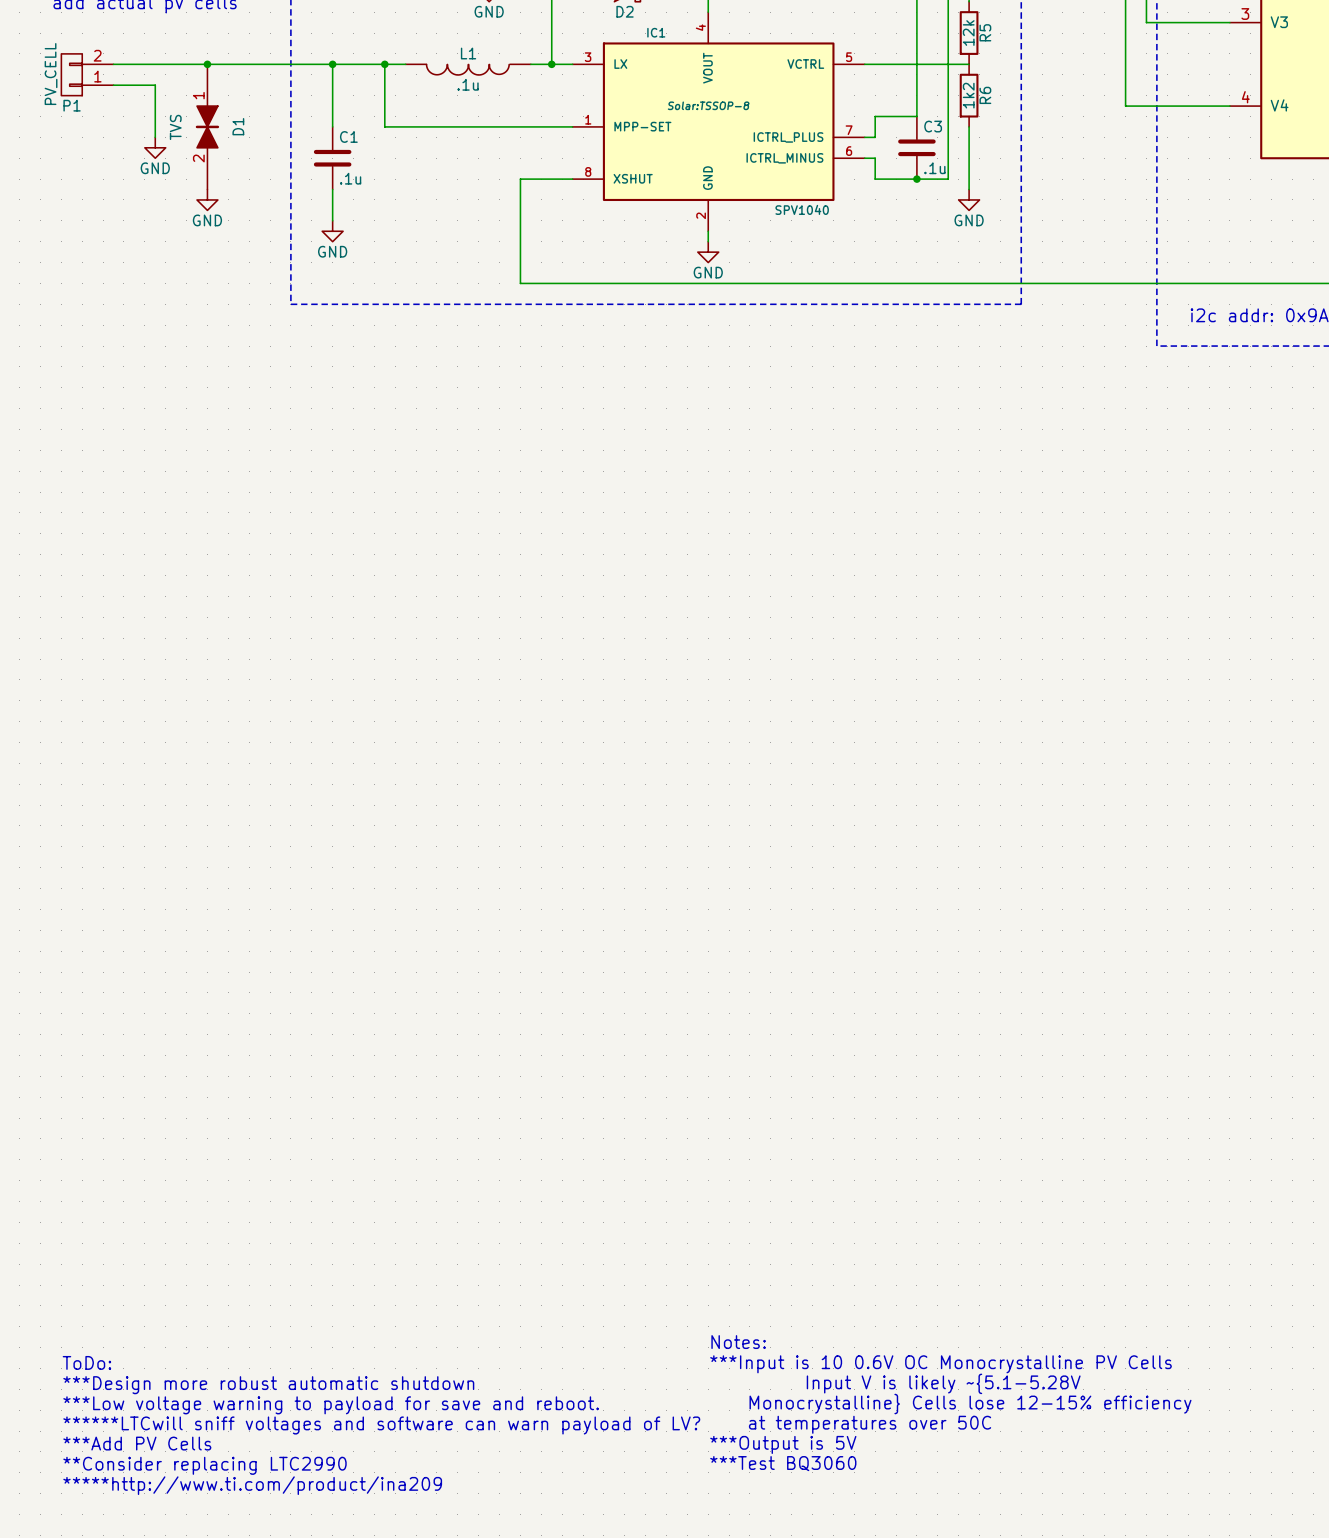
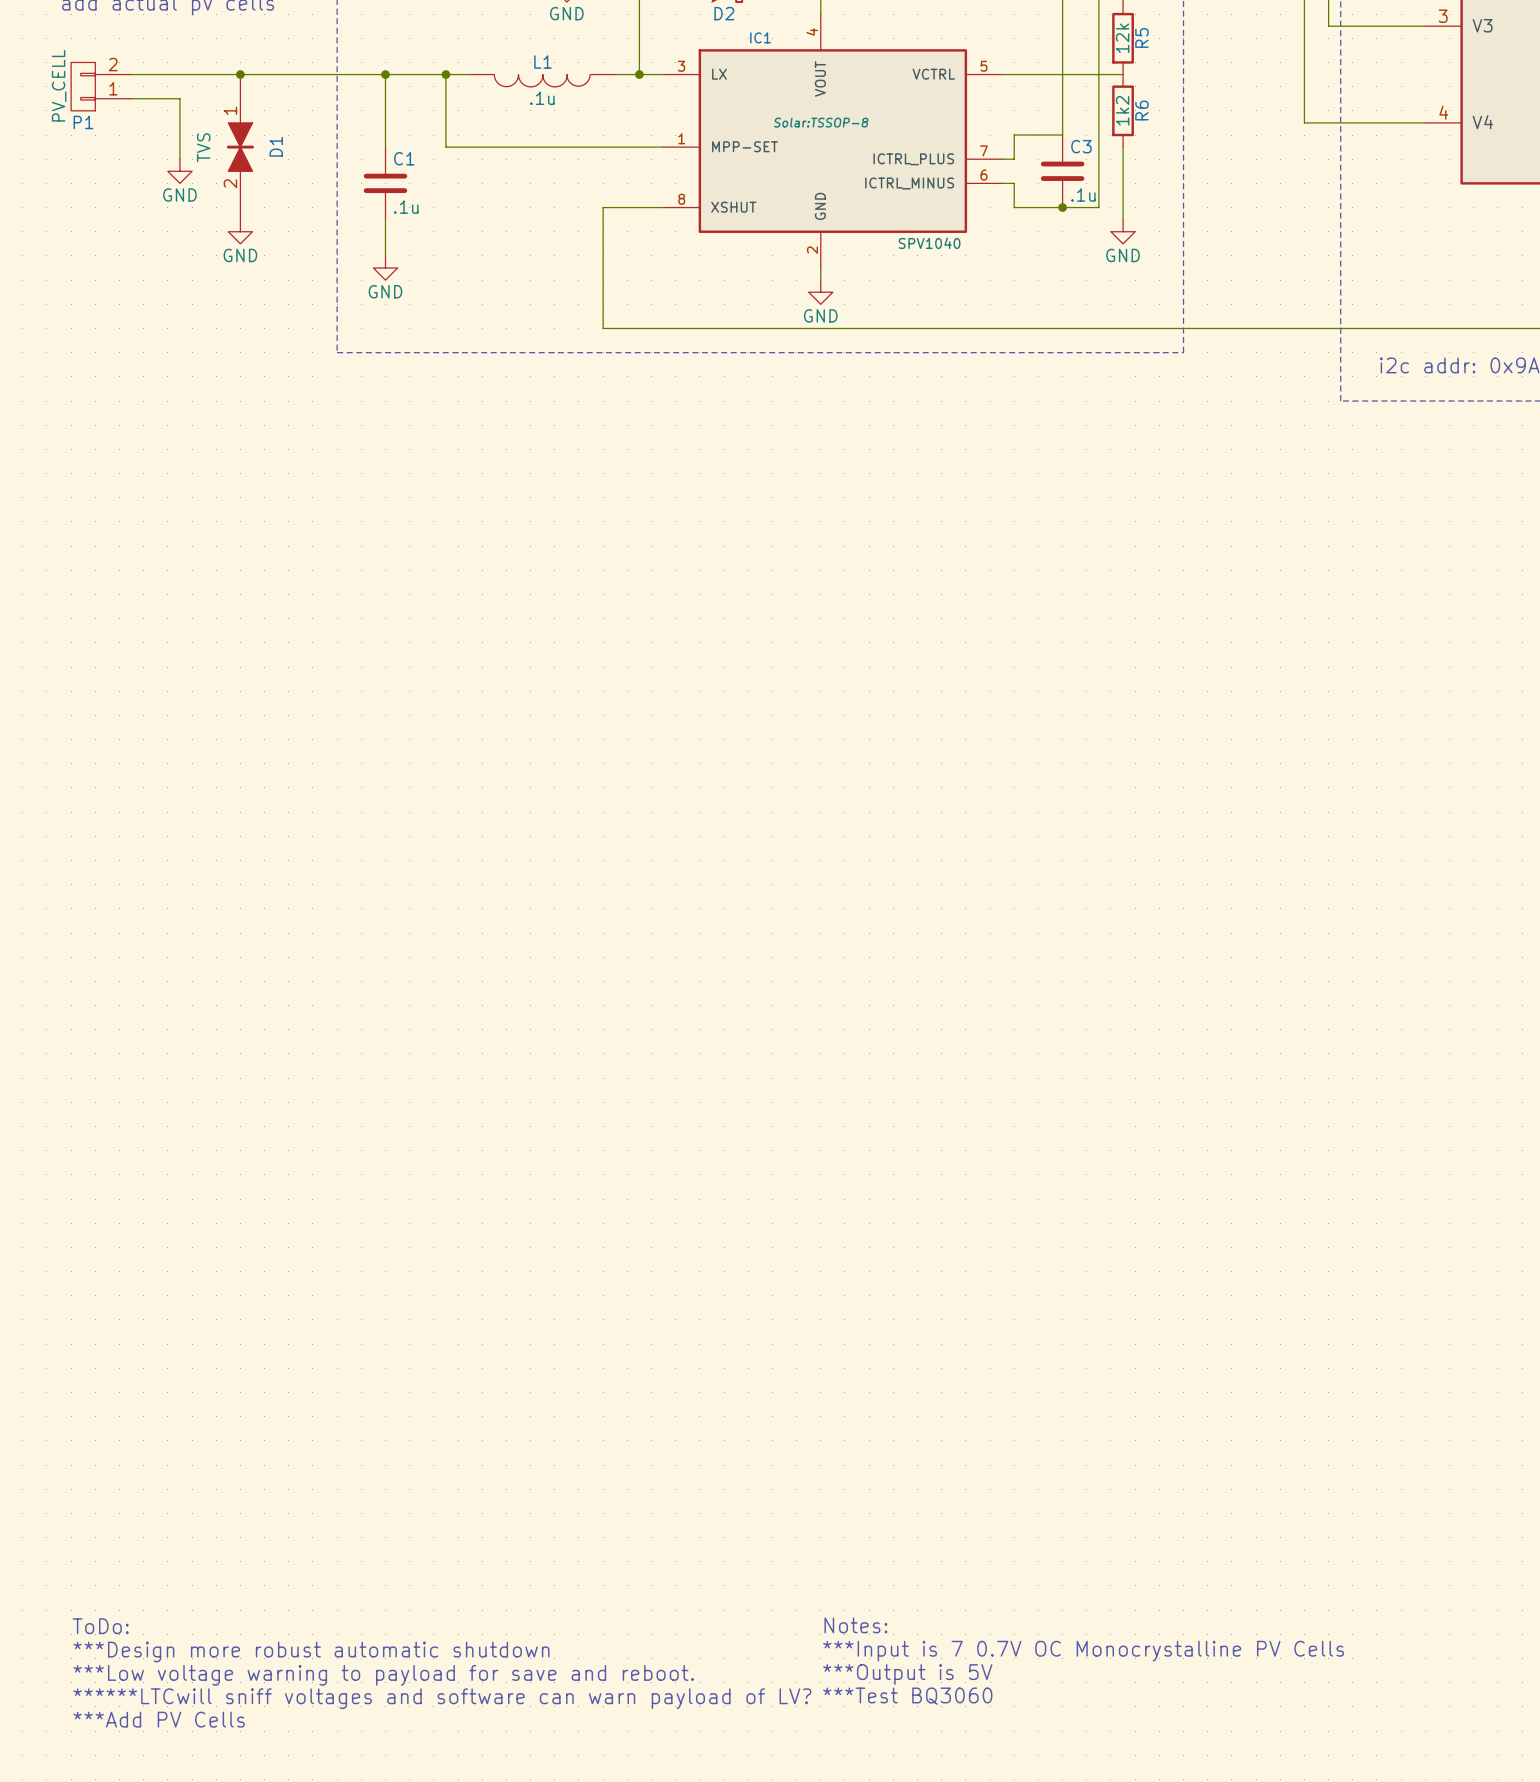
text: Notes: (738, 1342) -> none
text: ToDo: (86, 1362) -> none
text: ***Input is 10 0.6V OC Monocrystalline PV Cells (940, 1364) -> none
text: Input V is likely ~{5.1-5.28V (943, 1383) -> none
text: ***Design more robust automatic shutdown (268, 1385) -> none
text: Monocrystalline} Cells lose 12-15% efficiency (970, 1404) -> Notes: (855, 1625)
text: ***Low voltage warning to payload for save and reboot. (331, 1405) -> ToDo: (100, 1626)
text: at temperatures over 50C (870, 1424) -> ***Input is 7 0.7V OC Monocrystalline PV Cells (1083, 1651)
text: ******LTCwill sniff voltages and software can warn payload of LV? (381, 1425) -> ***Design more robust automatic shutdown (311, 1651)
text: ***Add PV Cells (137, 1443) -> ***Low voltage warning to payload for save and reboot. (383, 1675)
text: **Consider replacing LTC2990 (204, 1465) -> ******LTCwill sniff voltages and software can warn payload of LV? (442, 1698)
text: *****http://www.ti.com/product/ina209 (252, 1485) -> ***Add PV Cells (159, 1719)

